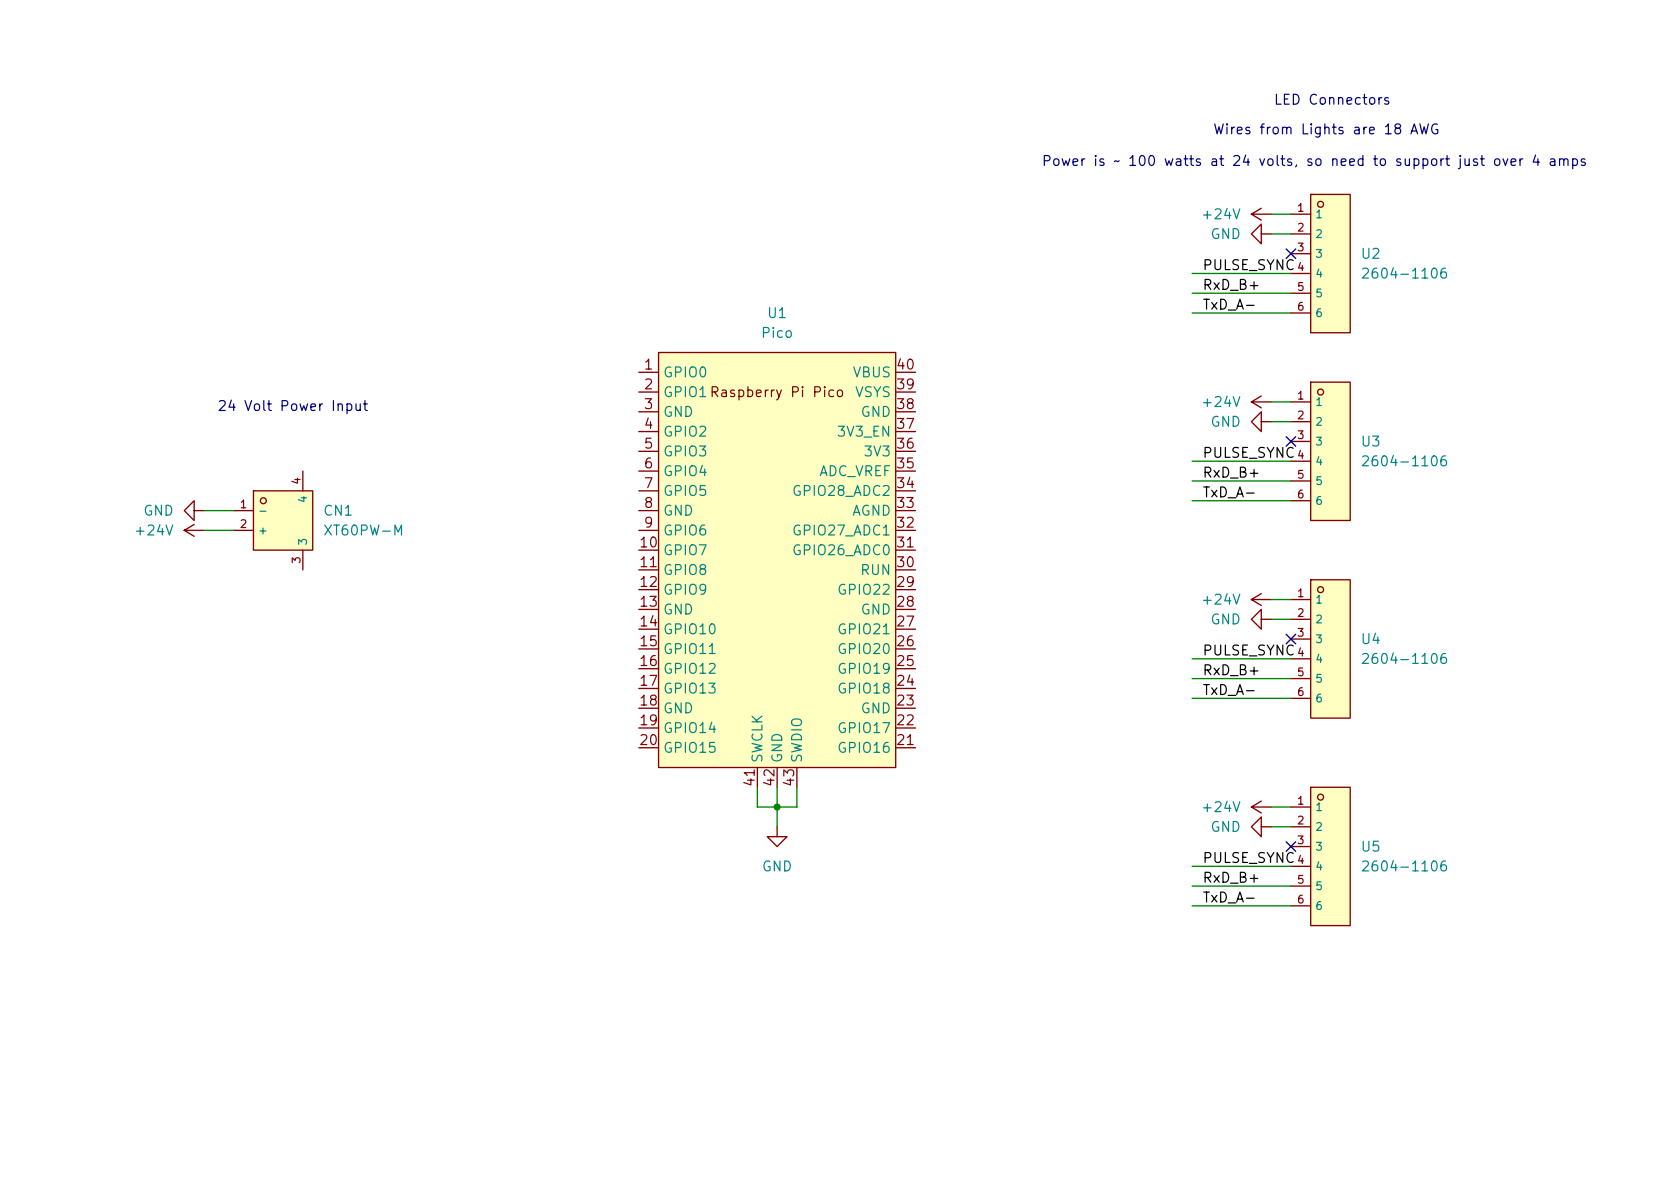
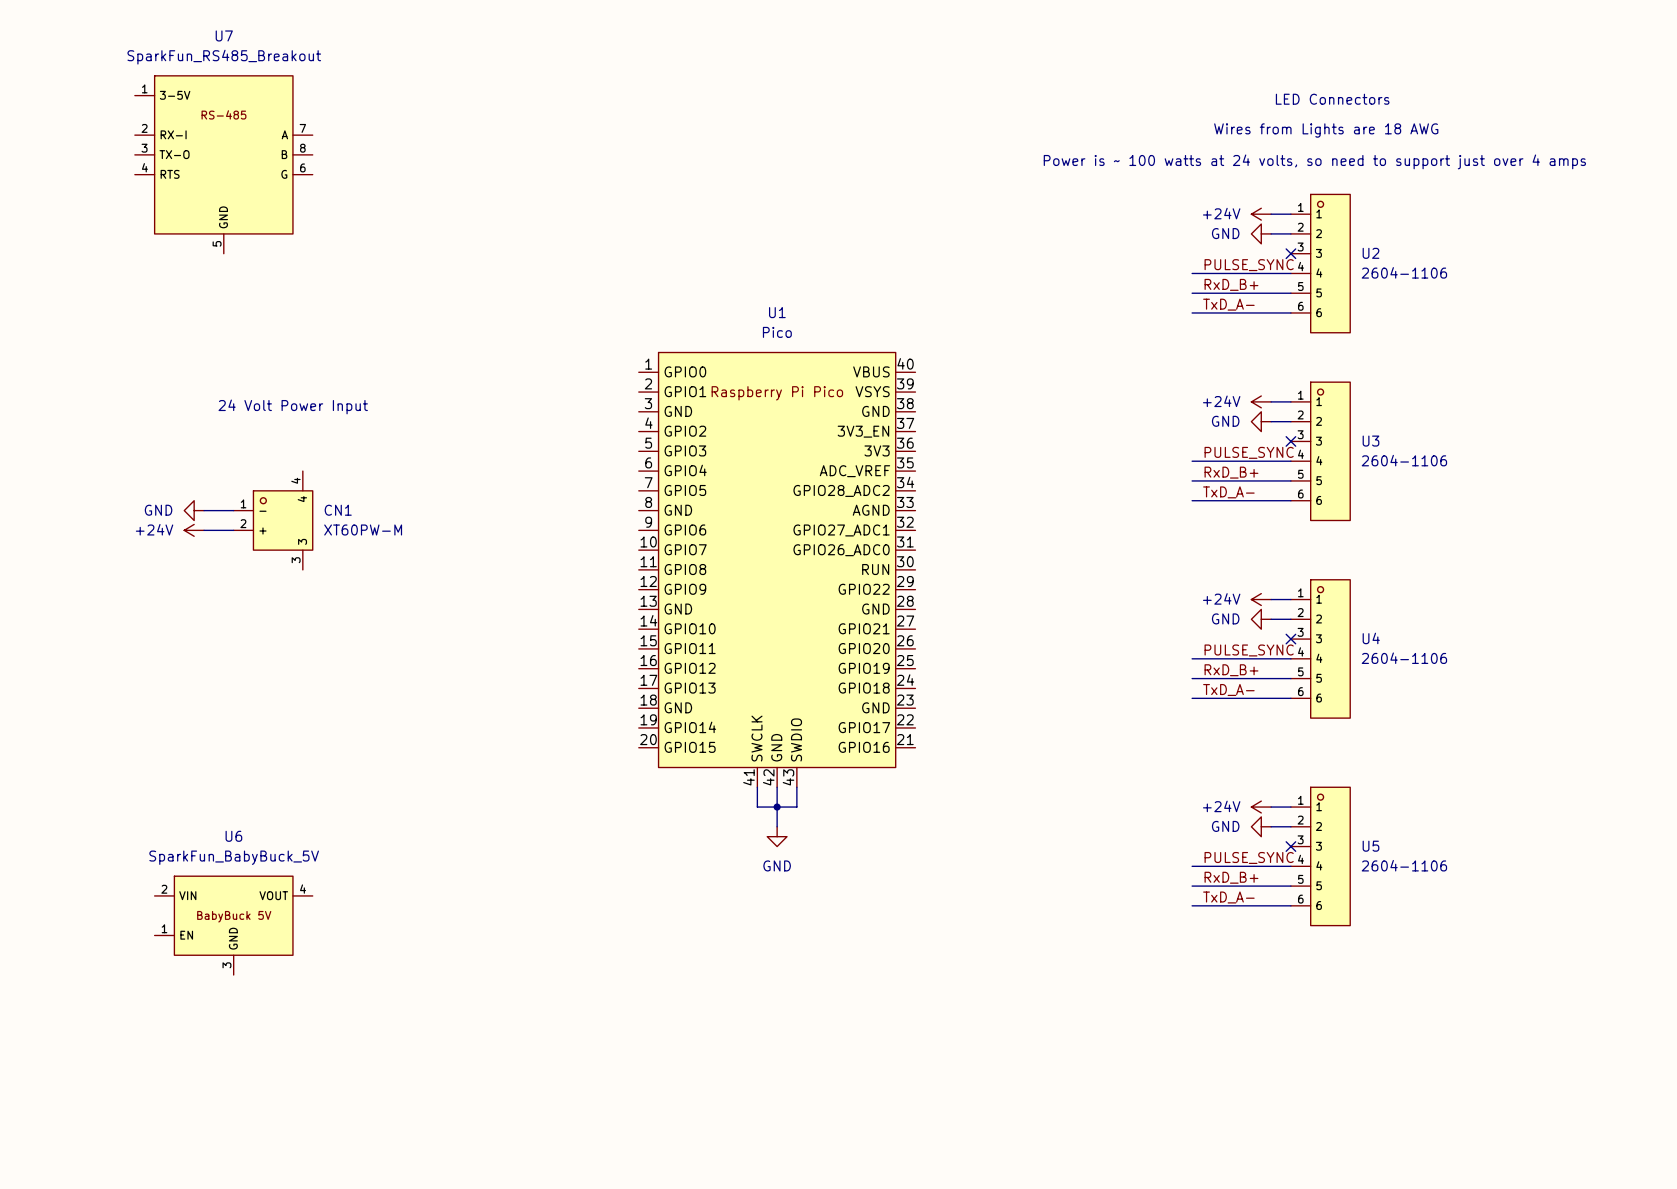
U7: none -> SparkFun_RS485_Breakout (223, 164)
U6: none -> SparkFun_BabyBuck_5V (233, 925)

